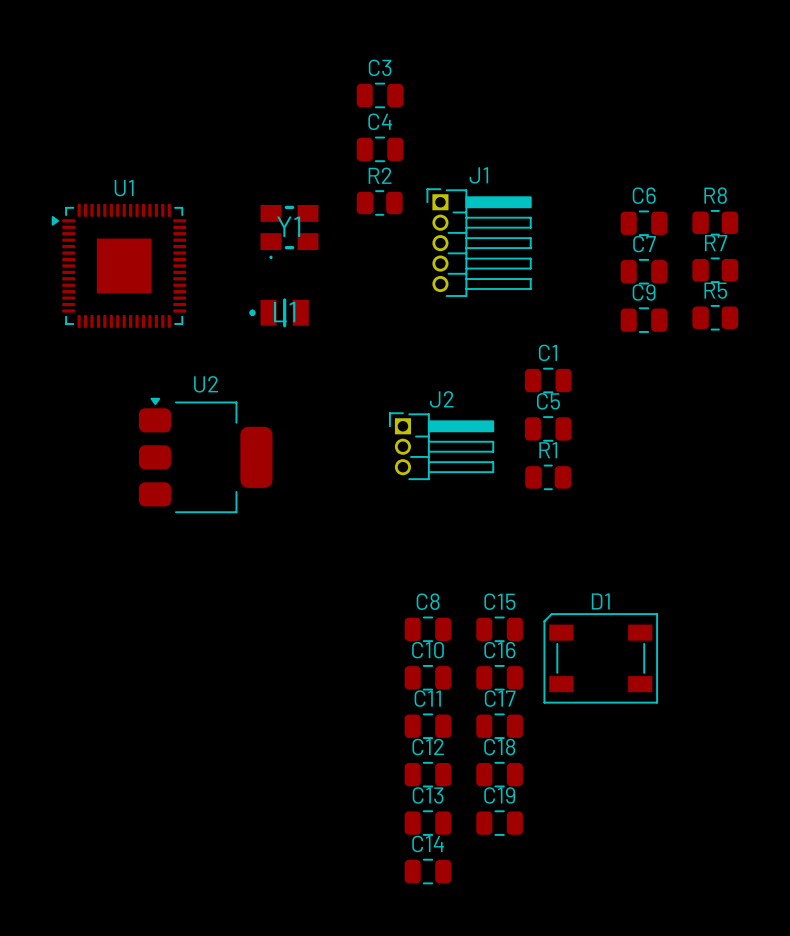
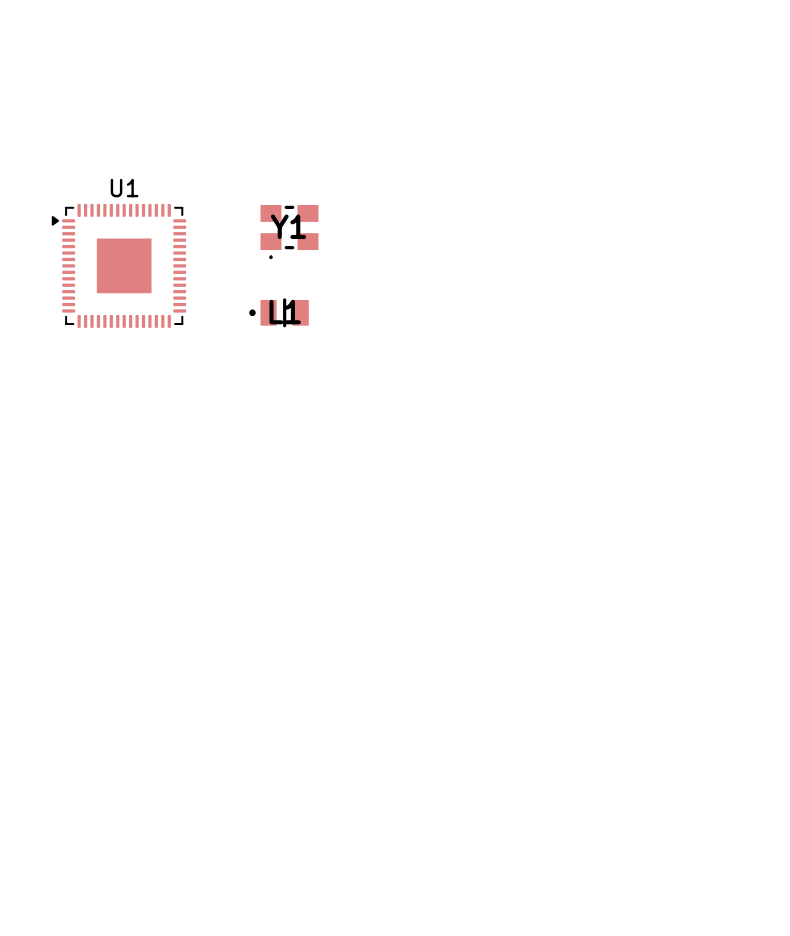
C3: (380, 95) -> none
C4: (380, 149) -> none
R2: (379, 202) -> none
R8: (715, 222) -> none
C6: (643, 223) -> none
J1: (479, 242) -> none
R7: (715, 270) -> none
C7: (643, 271) -> none
R5: (715, 317) -> none
C9: (643, 320) -> none
C1: (548, 380) -> none
C5: (548, 428) -> none
J2: (441, 446) -> none
U2: (205, 455) -> none
R1: (548, 477) -> none
C8: (427, 629) -> none
C15: (499, 629) -> none
D1: (600, 658) -> none
C10: (427, 677) -> none
C16: (499, 677) -> none
C11: (427, 726) -> none
C17: (499, 726) -> none
C12: (427, 774) -> none
C18: (499, 774) -> none
C13: (427, 823) -> none
C19: (499, 823) -> none
C14: (427, 871) -> none

